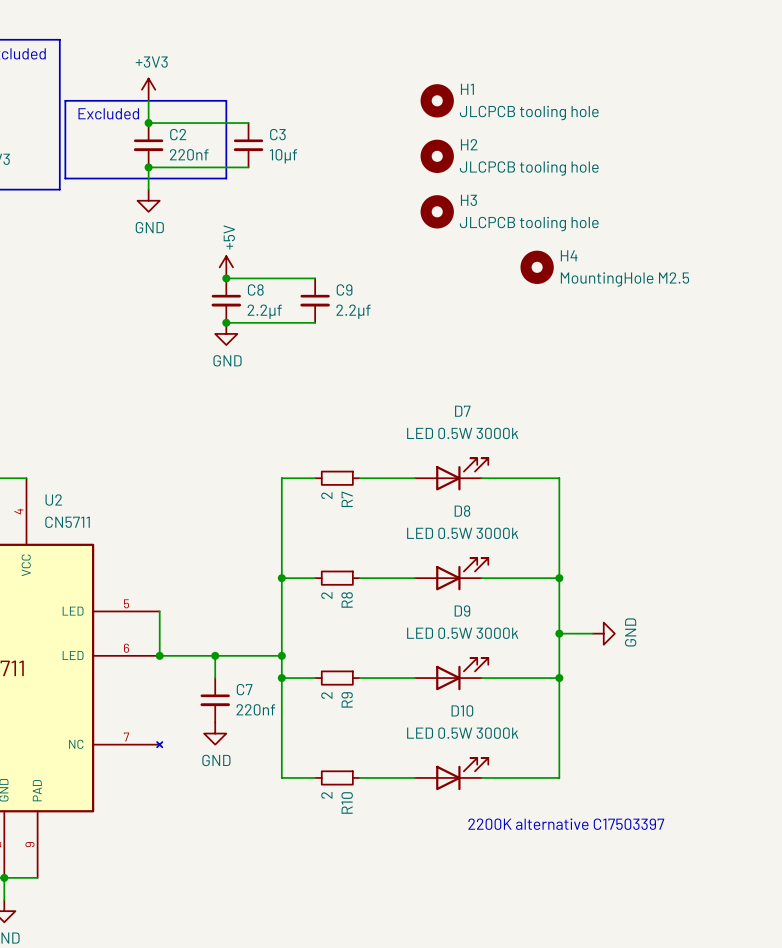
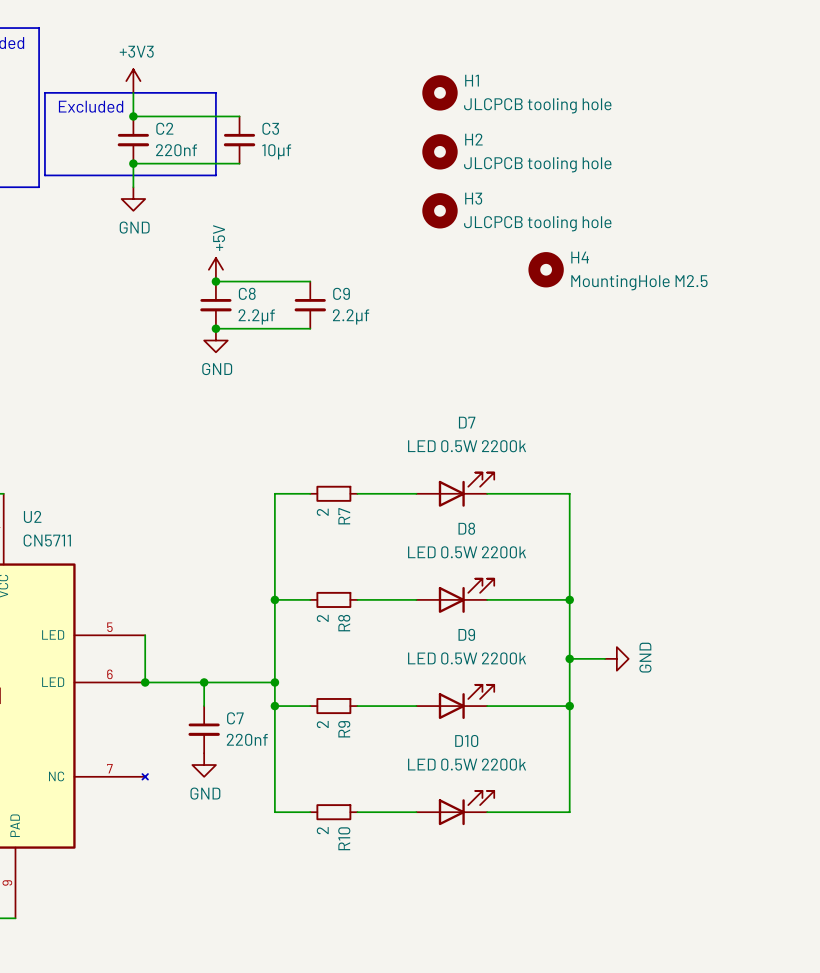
D7 value: LED 0.5W 3000k (462, 433) -> LED 0.5W 2200k (467, 446)
D8 value: LED 0.5W 3000k (462, 533) -> LED 0.5W 2200k (467, 552)
D9 value: LED 0.5W 3000k (462, 633) -> LED 0.5W 2200k (467, 658)
D10 value: LED 0.5W 3000k (462, 733) -> LED 0.5W 2200k (467, 764)
text: 2200K alternative C17503397 (566, 824) -> none

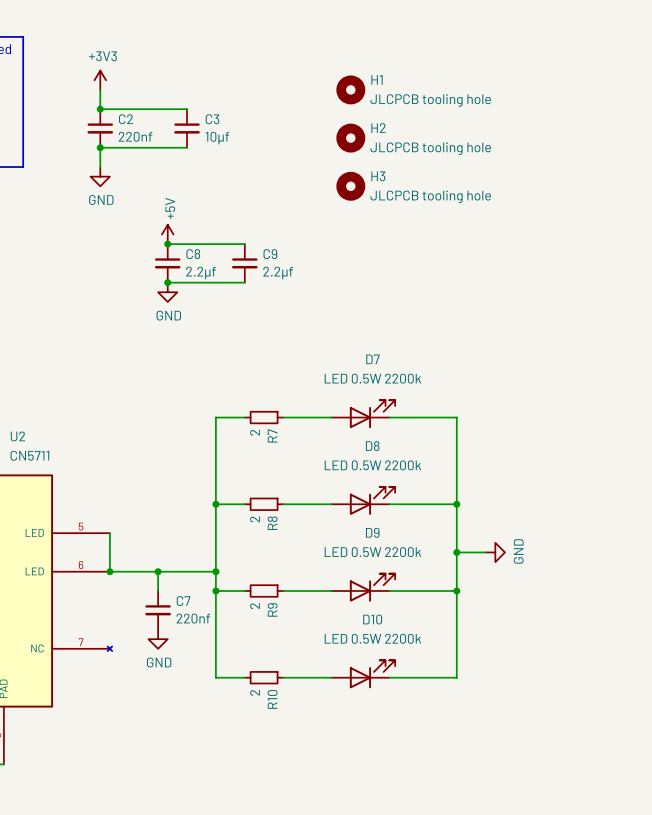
line: (44, 92) (215, 92) (215, 175) (44, 175) (44, 92) -> none
text: Excluded (91, 106) -> none
H4: MountingHole M2.5 (546, 269) -> none

